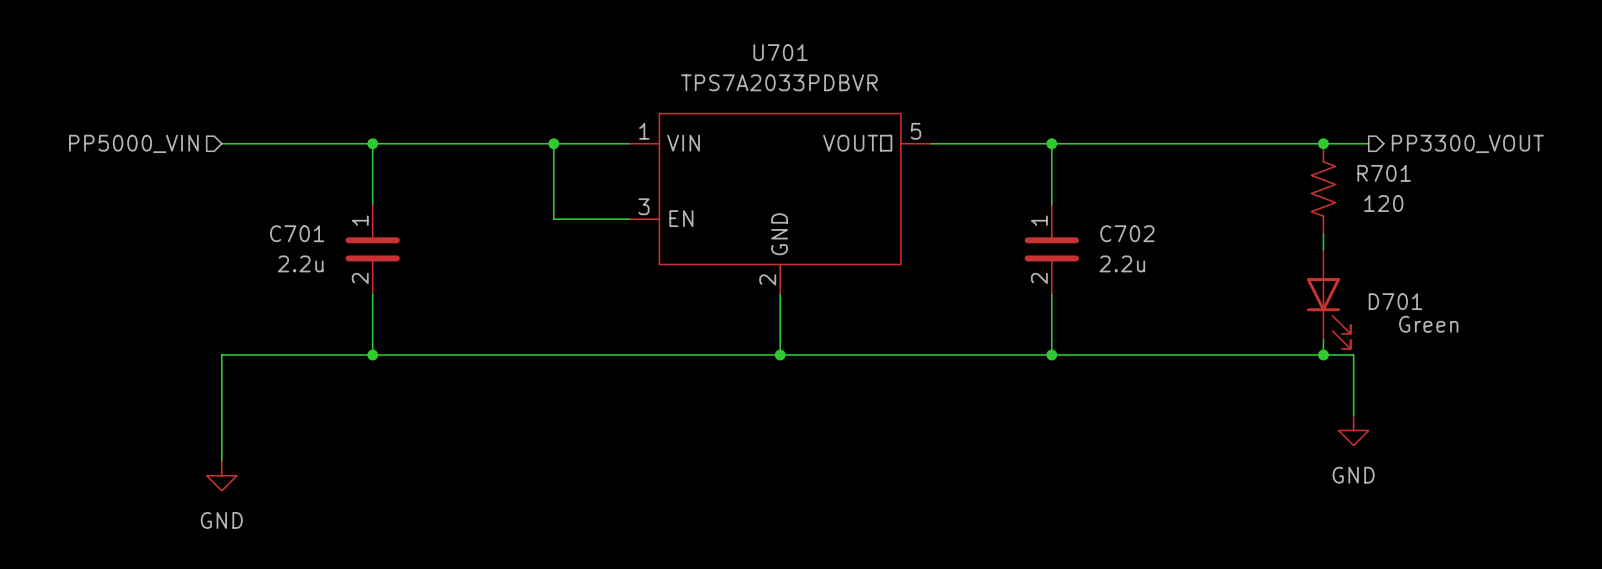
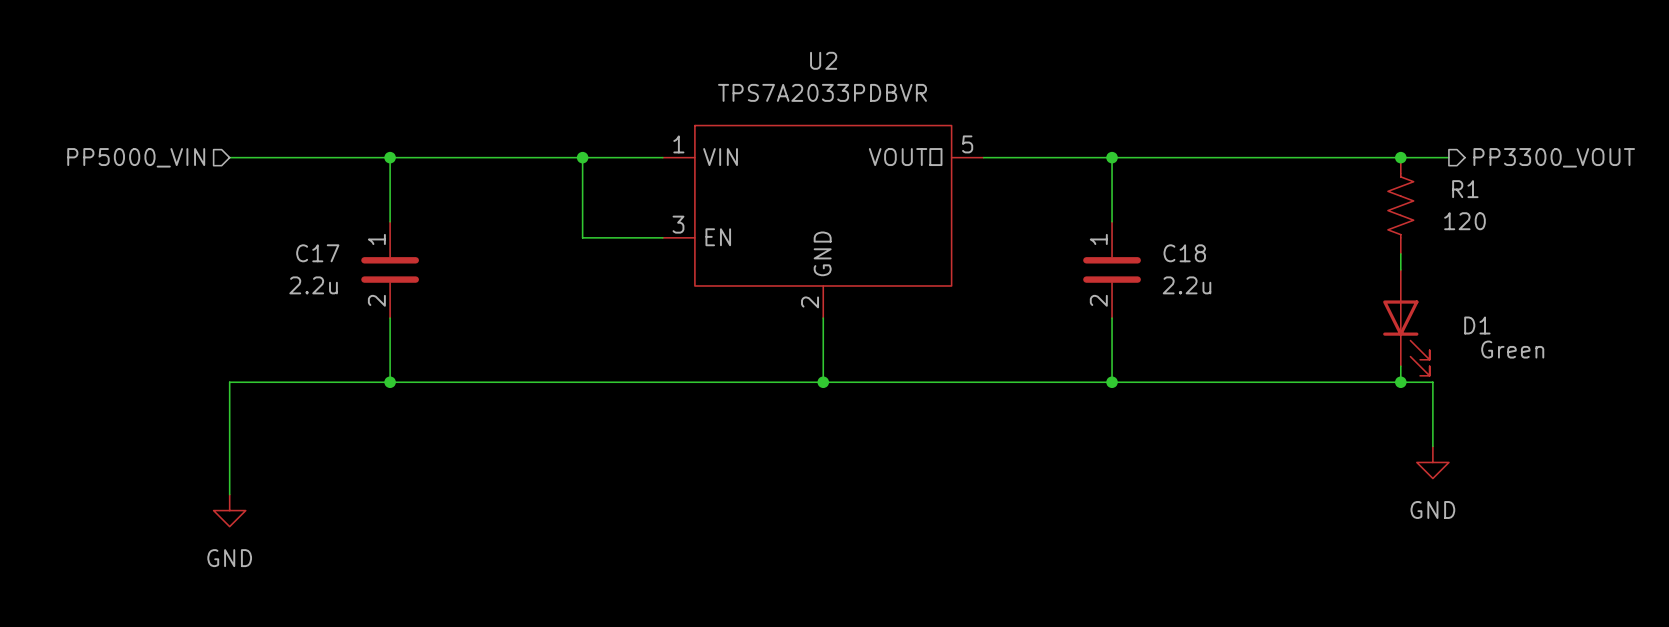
U701 name: U701 (780, 52) -> U2 (823, 60)
R701 name: R701 (1384, 173) -> R1 (1465, 189)
C701 name: C701 (297, 233) -> C17 (317, 253)
C702 name: C702 (1127, 233) -> C18 (1184, 253)
D701 name: D701 (1395, 301) -> D1 (1477, 325)

